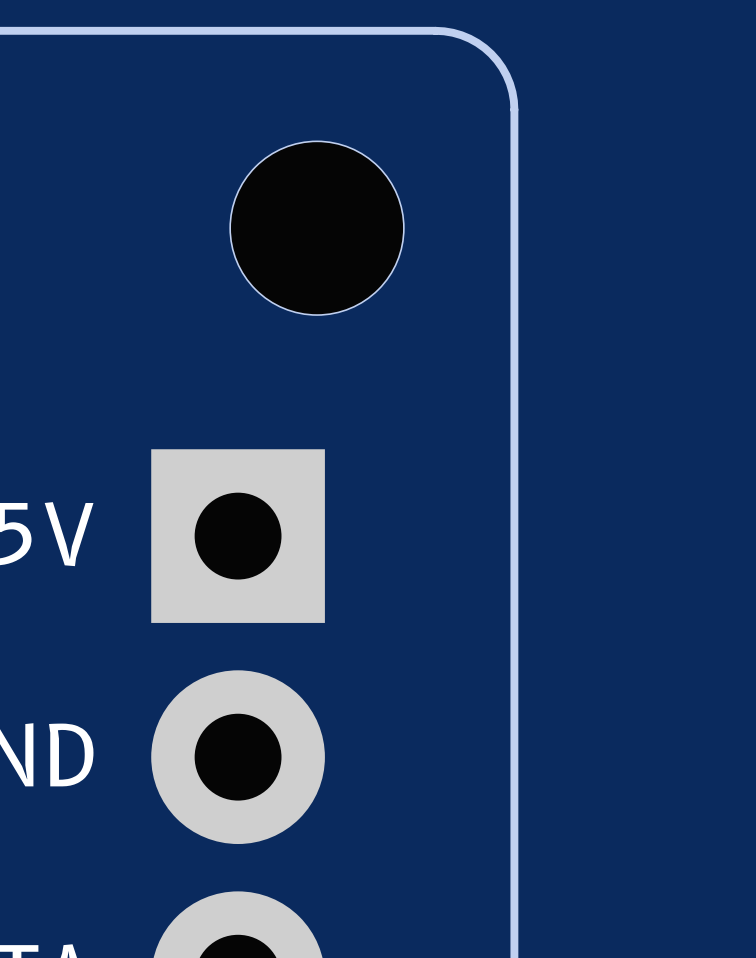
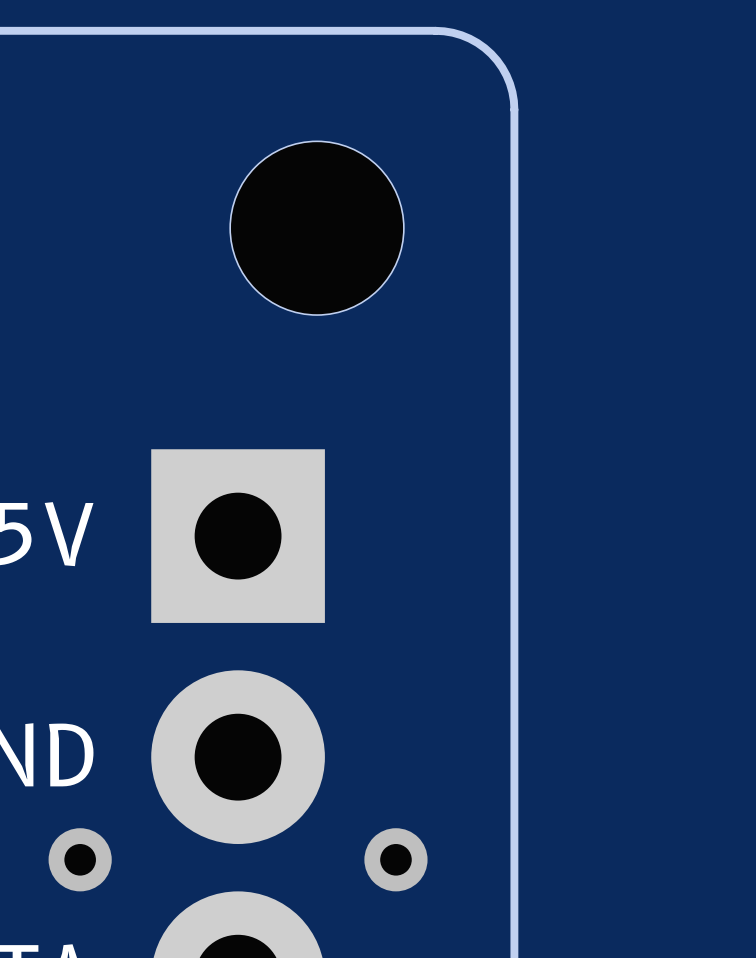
via: none -> (80, 859)
via: none -> (395, 859)

